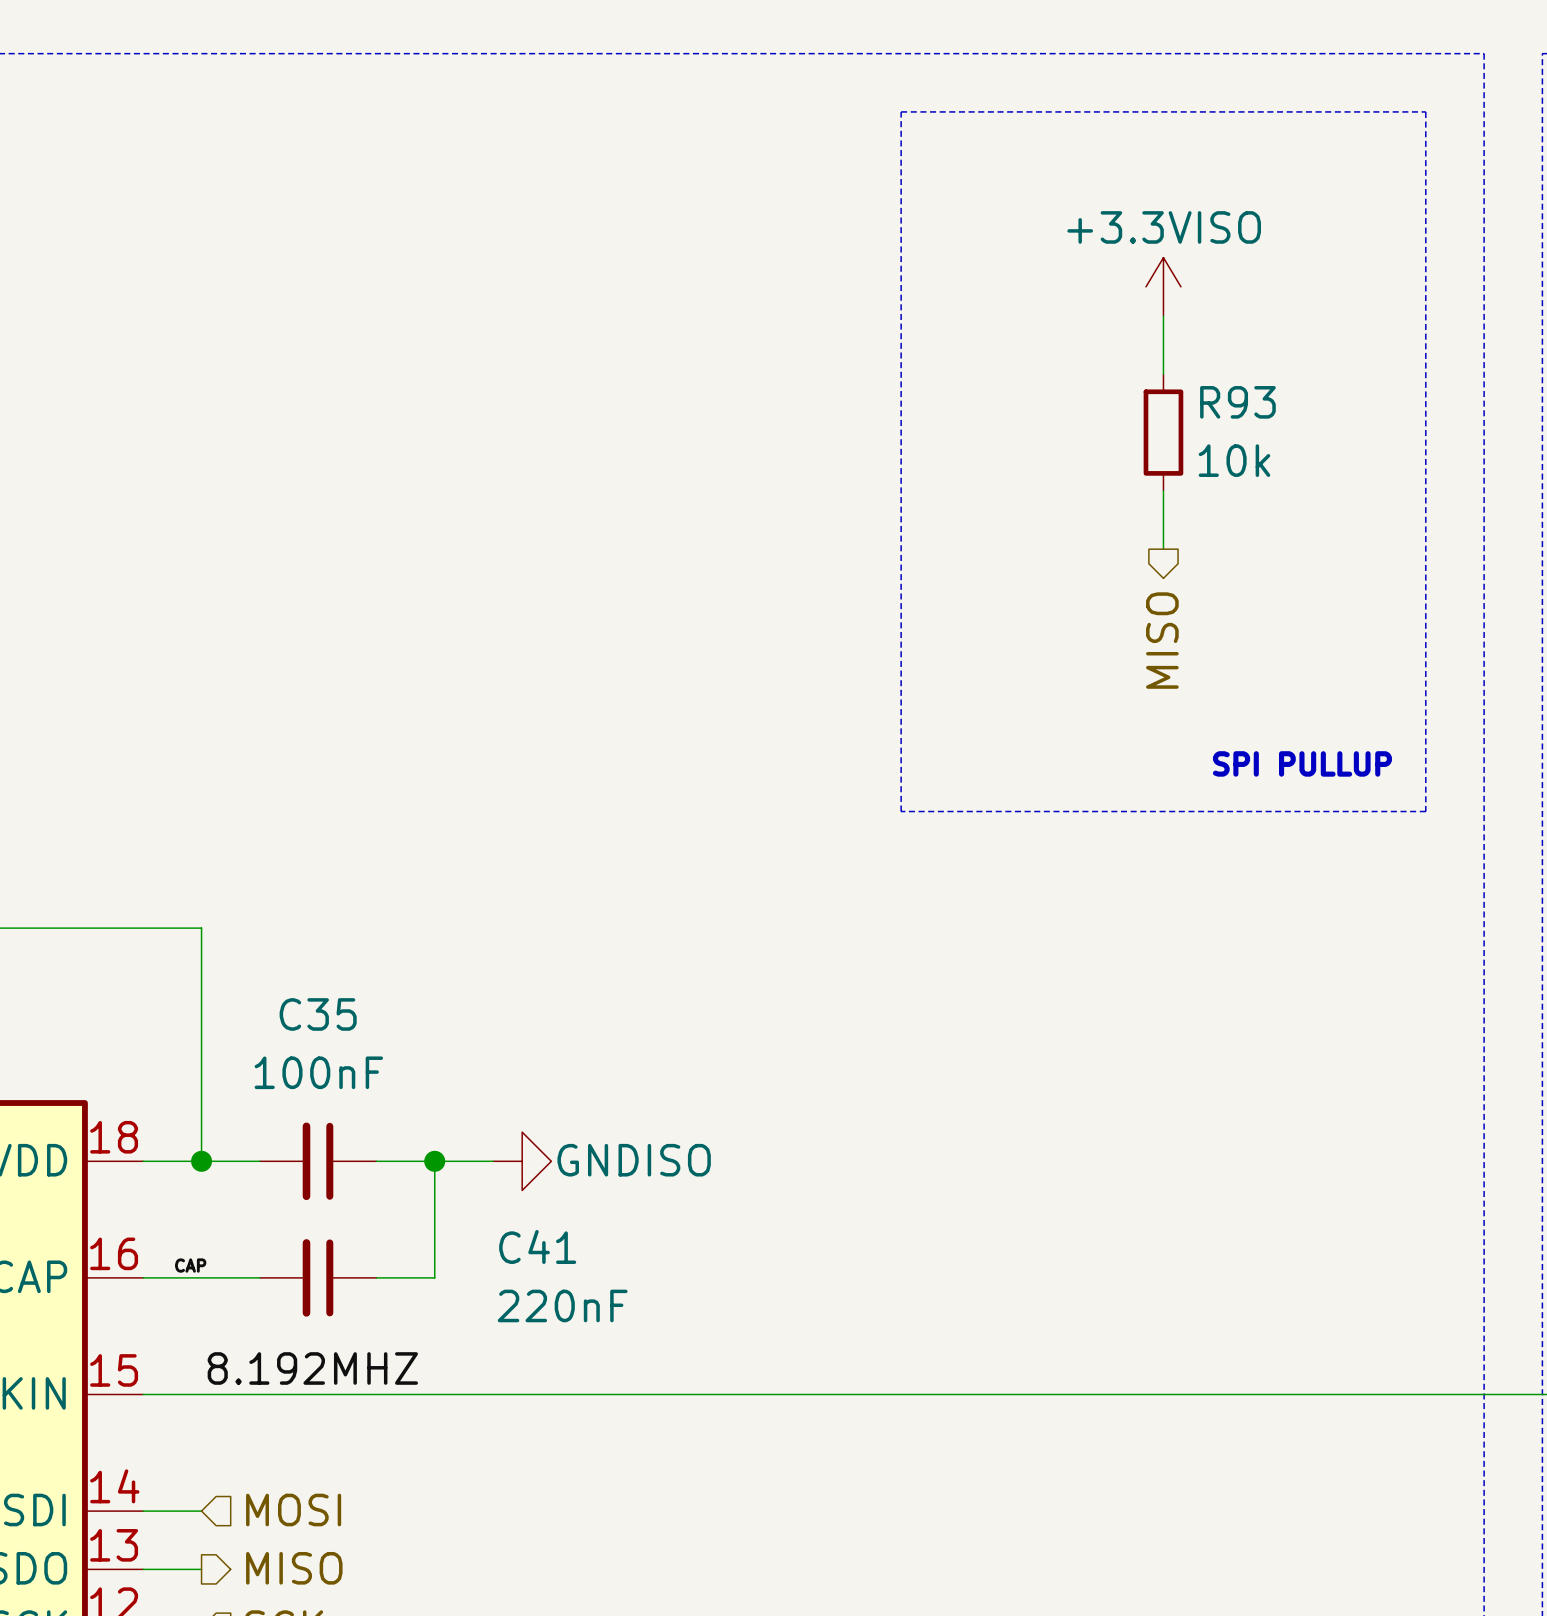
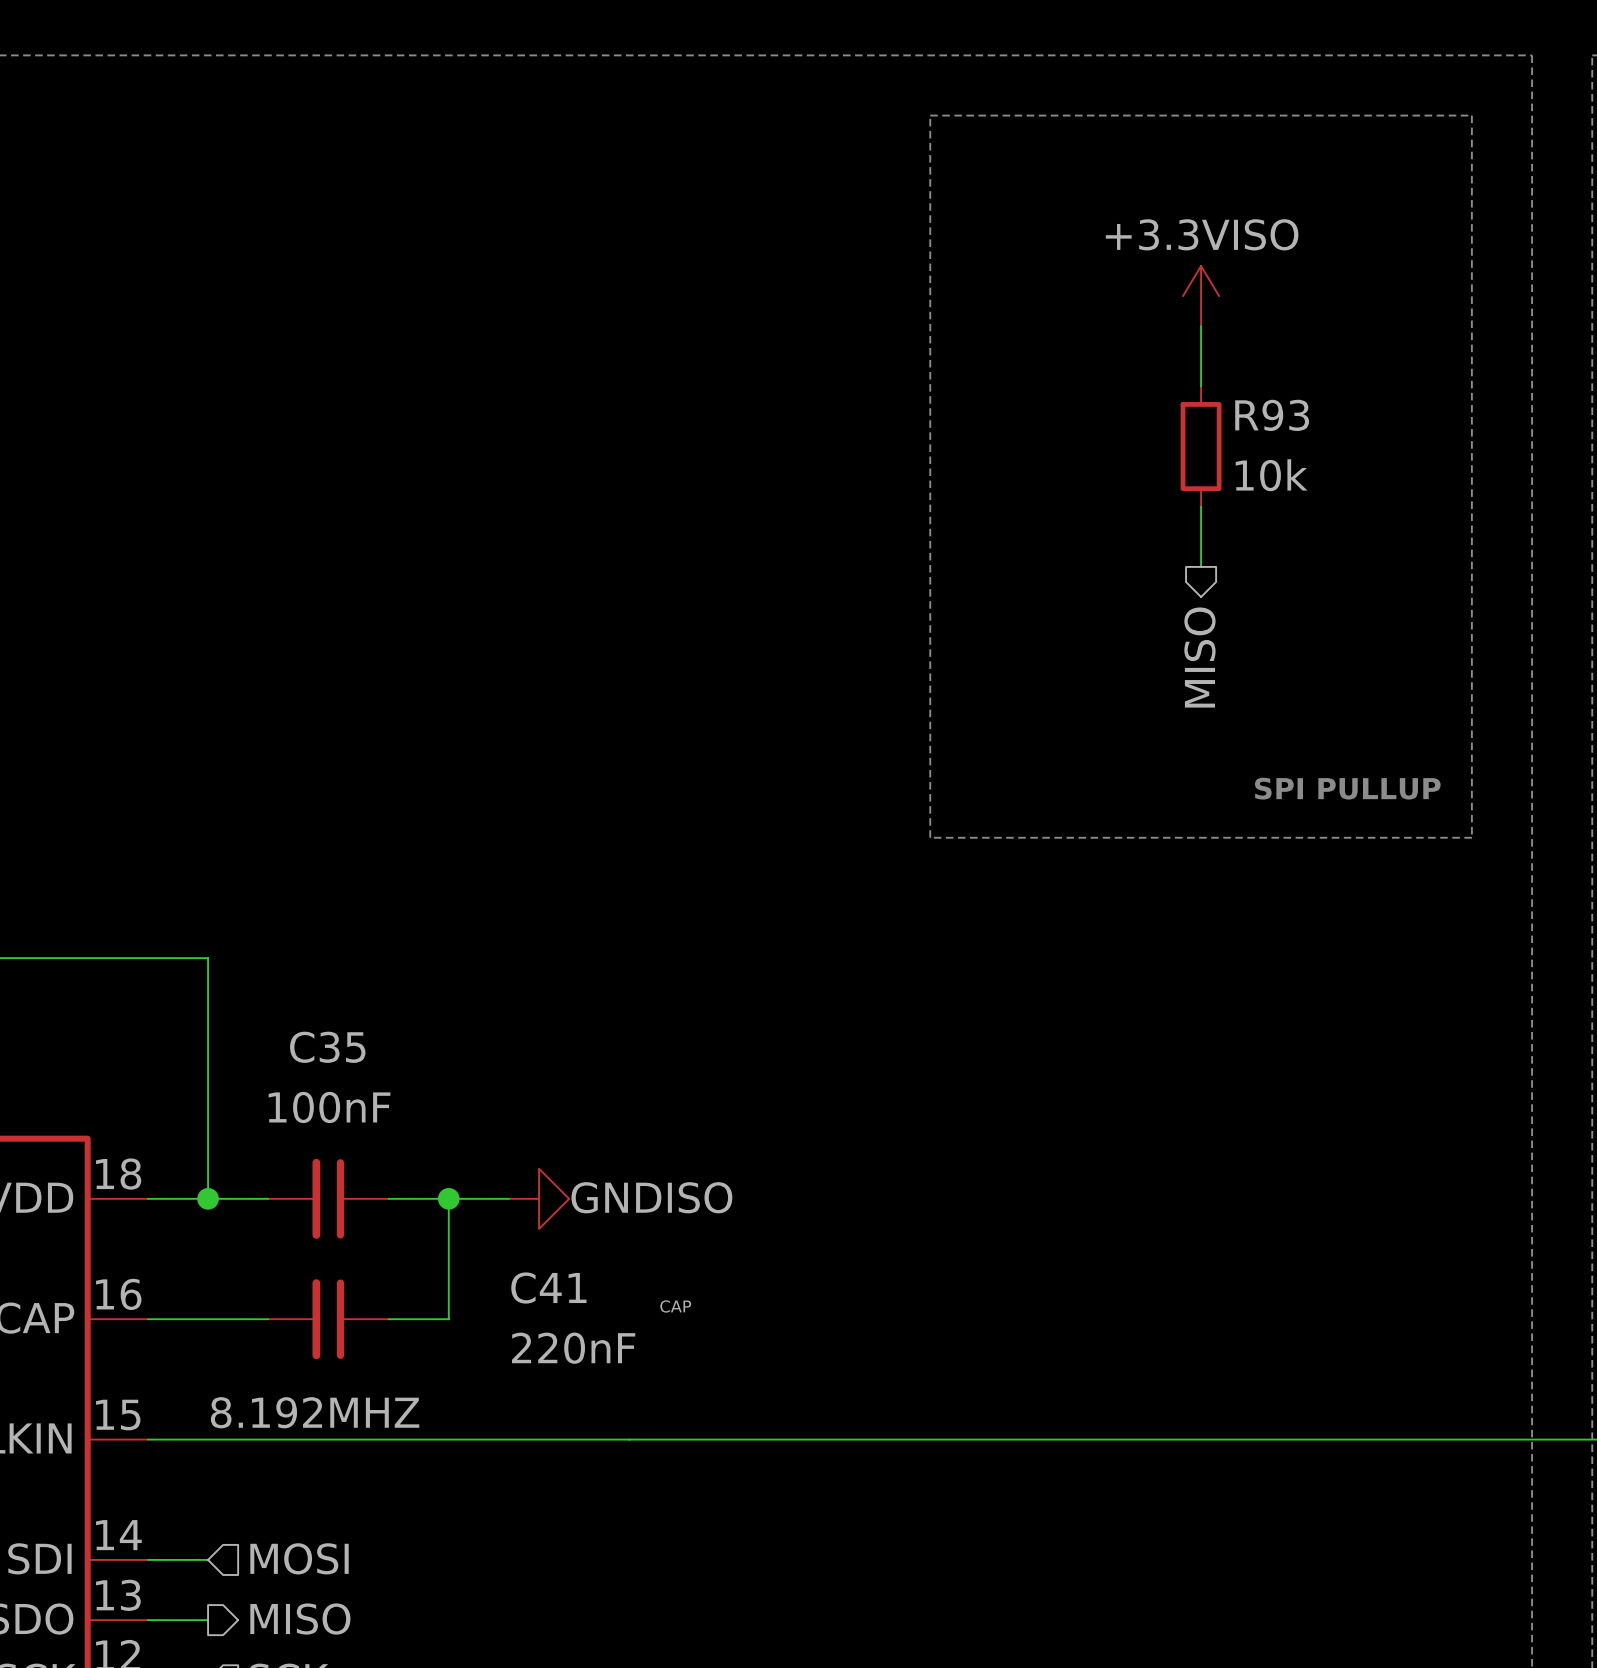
label position: CAP (190, 1265) -> CAP (675, 1306)

